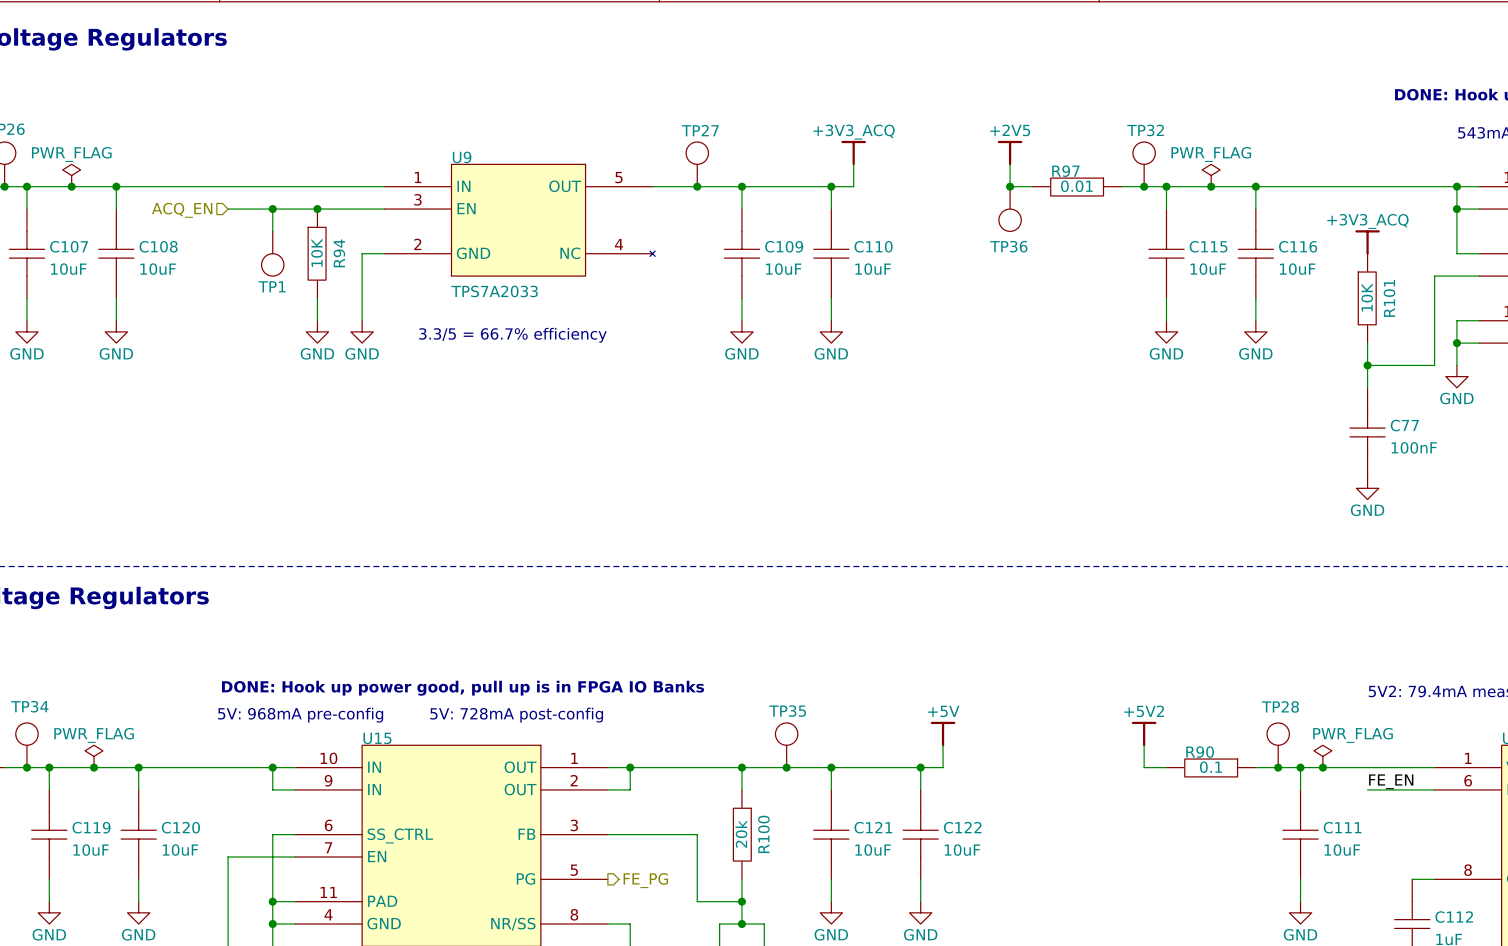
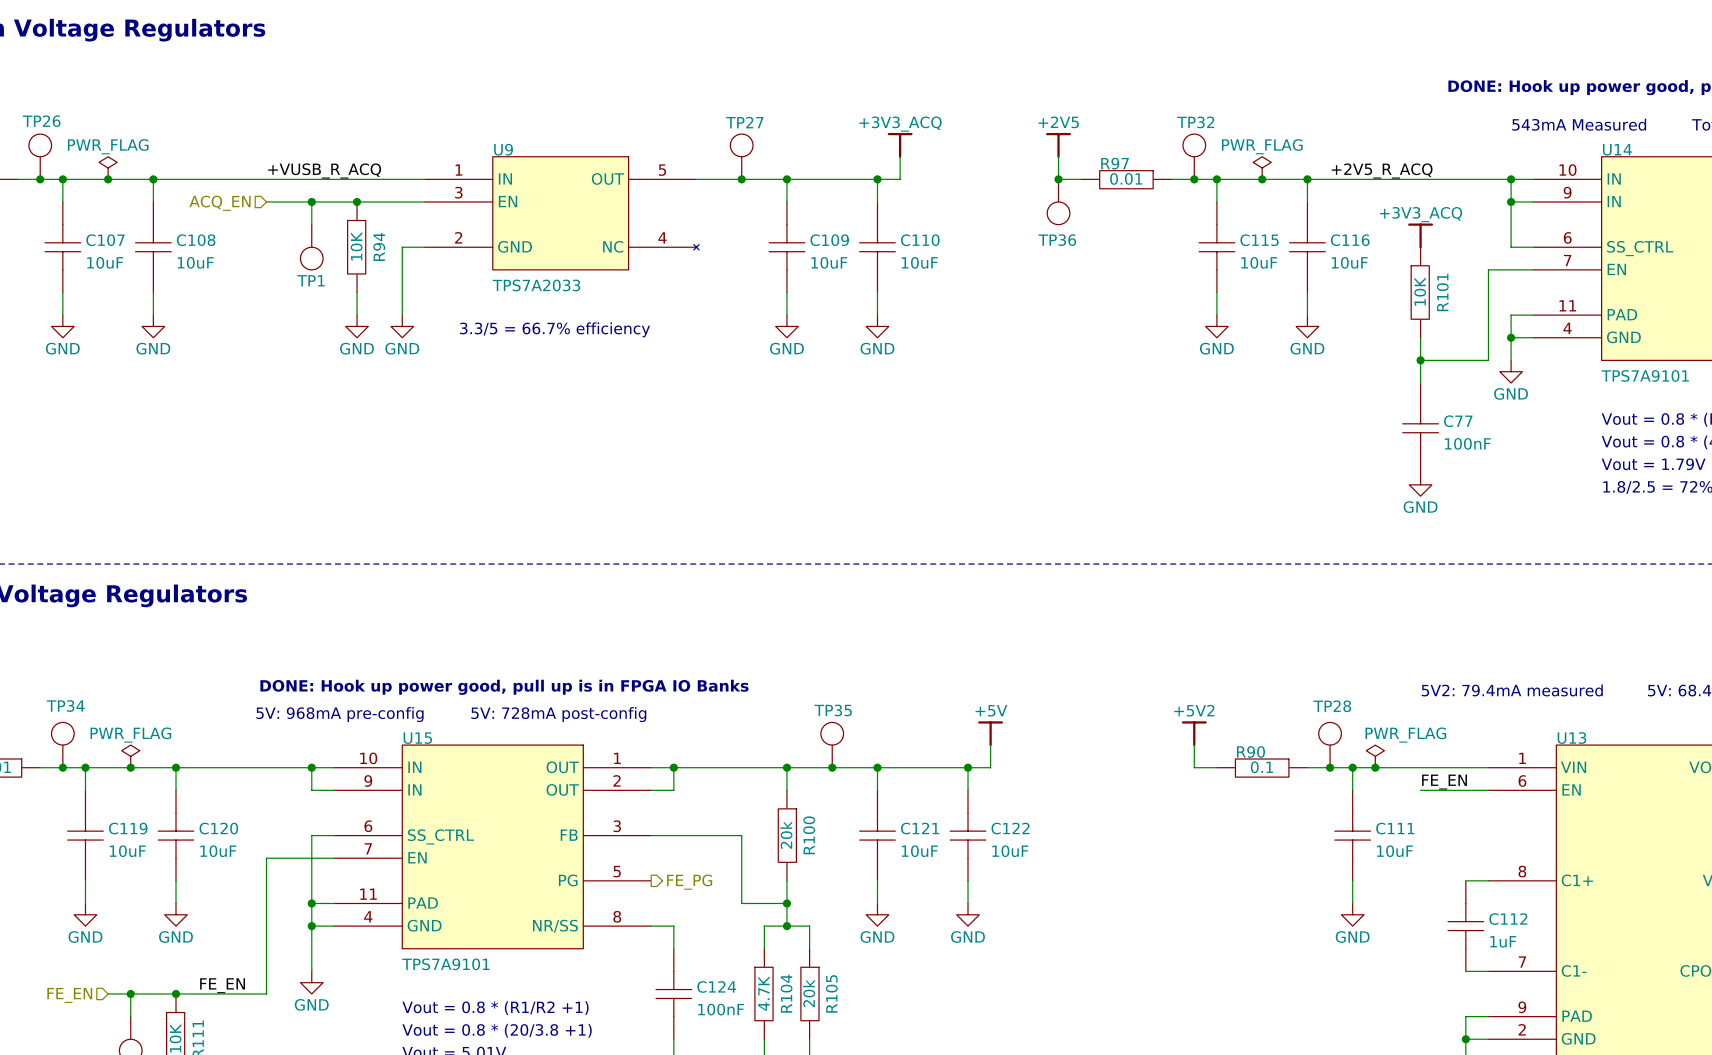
label: none -> +VUSB_R_ACQ (324, 170)
label: none -> +2V5_R_ACQ (1382, 170)

